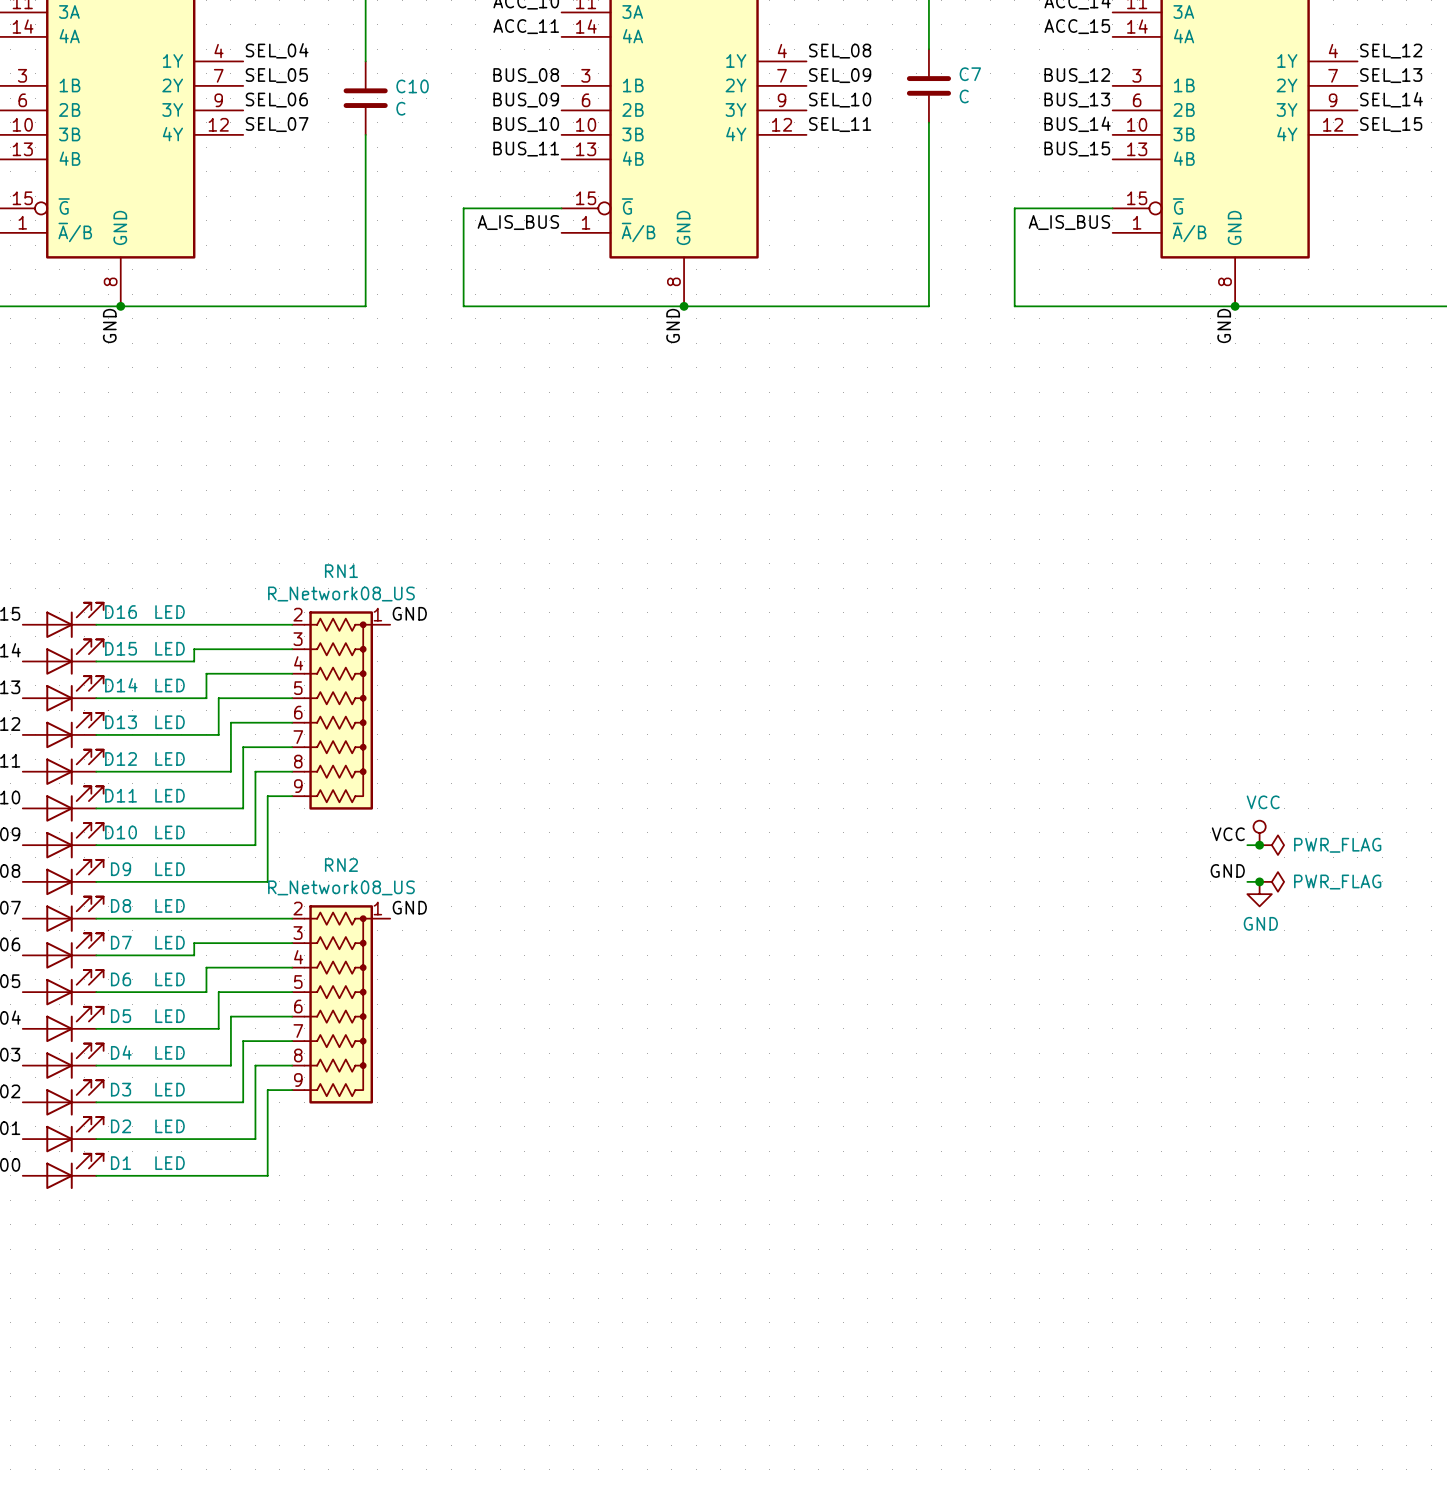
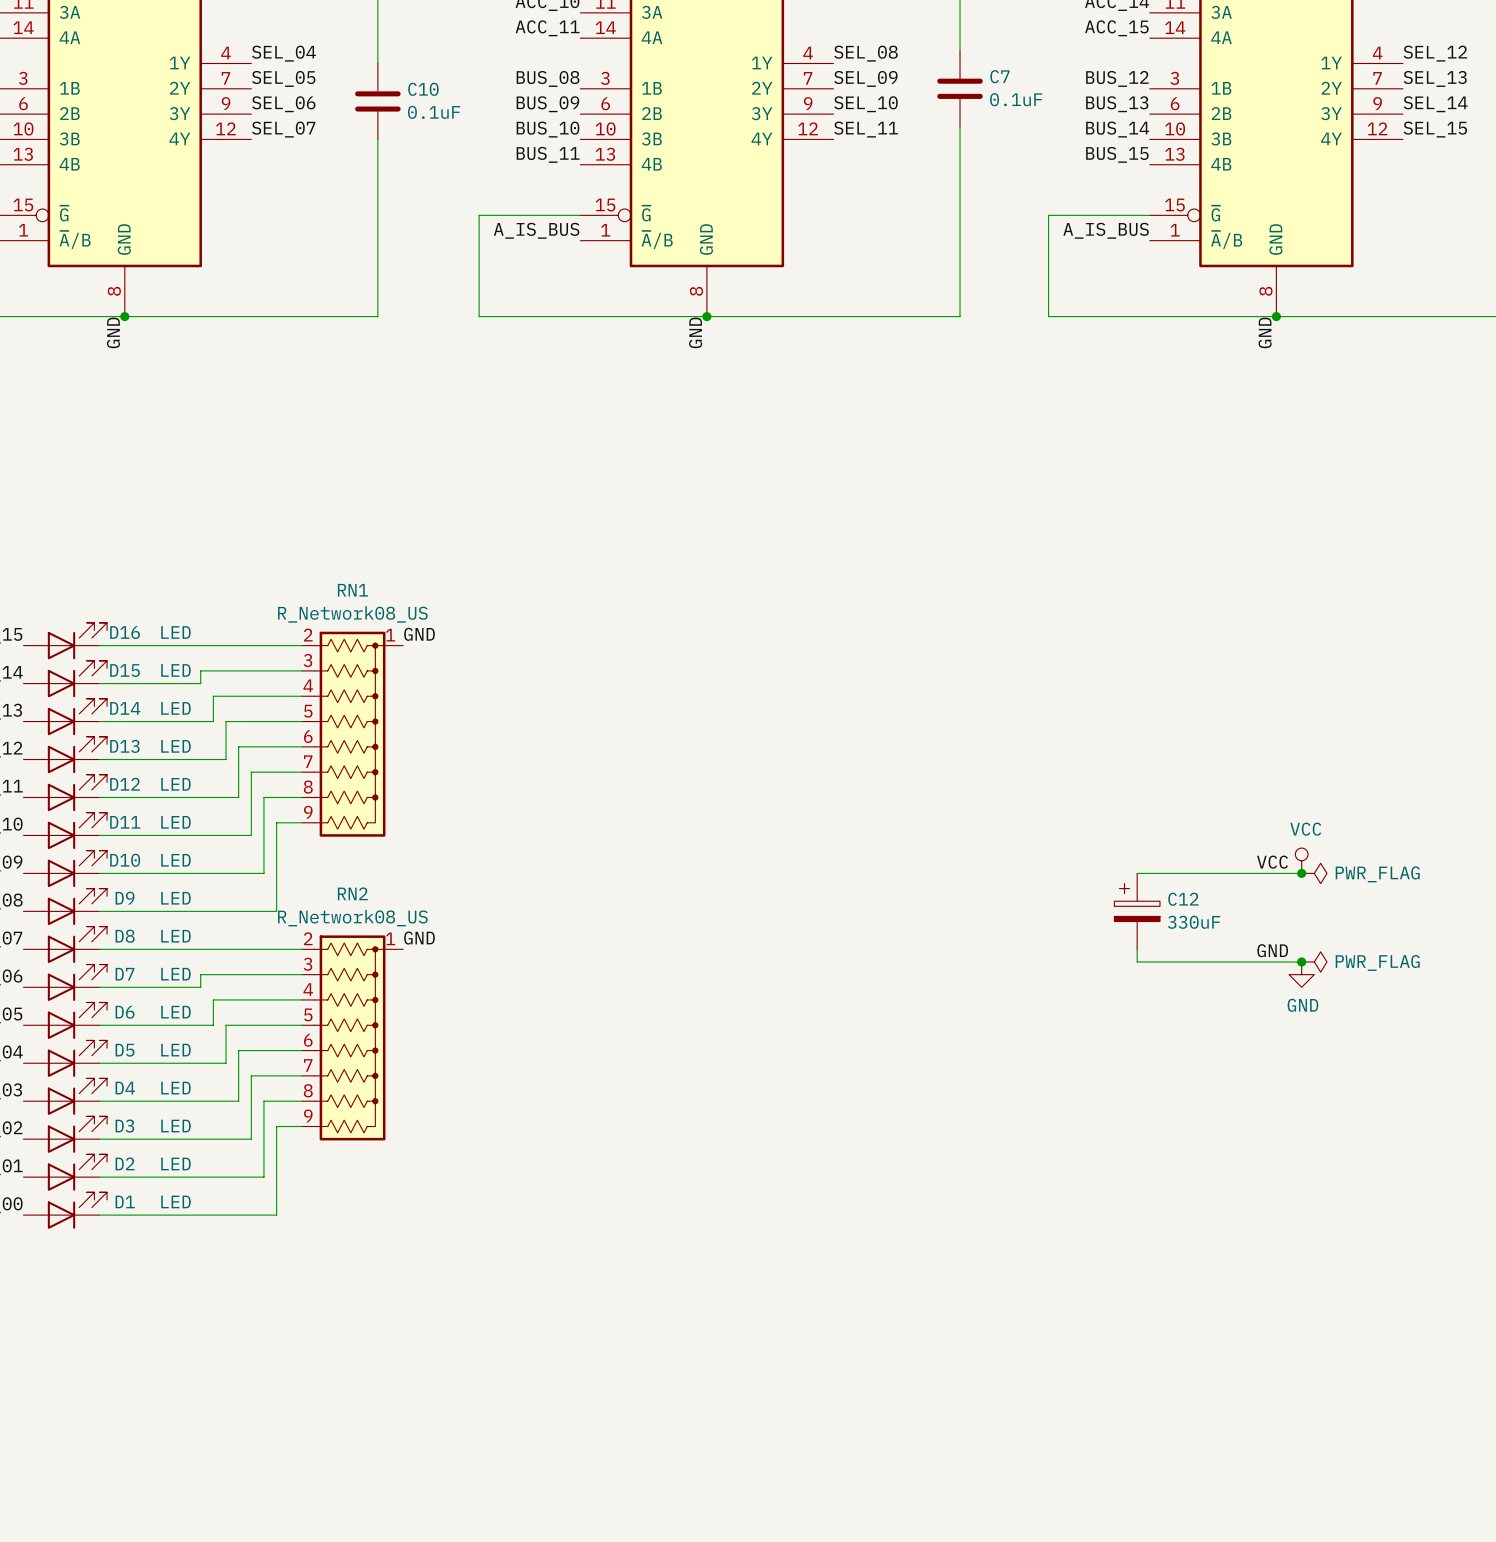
C7 value: C (964, 96) -> 0.1uF (1016, 99)
C10 value: C (400, 108) -> 0.1uF (434, 112)
wire: none -> (1137, 873) (1289, 873)
label position: GND (1227, 870) -> GND (1272, 950)
C12: none -> 330uF (1137, 911)
wire: (1247, 881) (1259, 881) -> none
junction position: (1259, 881) -> (1301, 961)
power symbol position: PWR_FLAG (1271, 881) -> PWR_FLAG (1314, 961)
power symbol position: GND (1259, 894) -> GND (1301, 974)
wire: none -> (1137, 949) (1137, 961) (1301, 961)

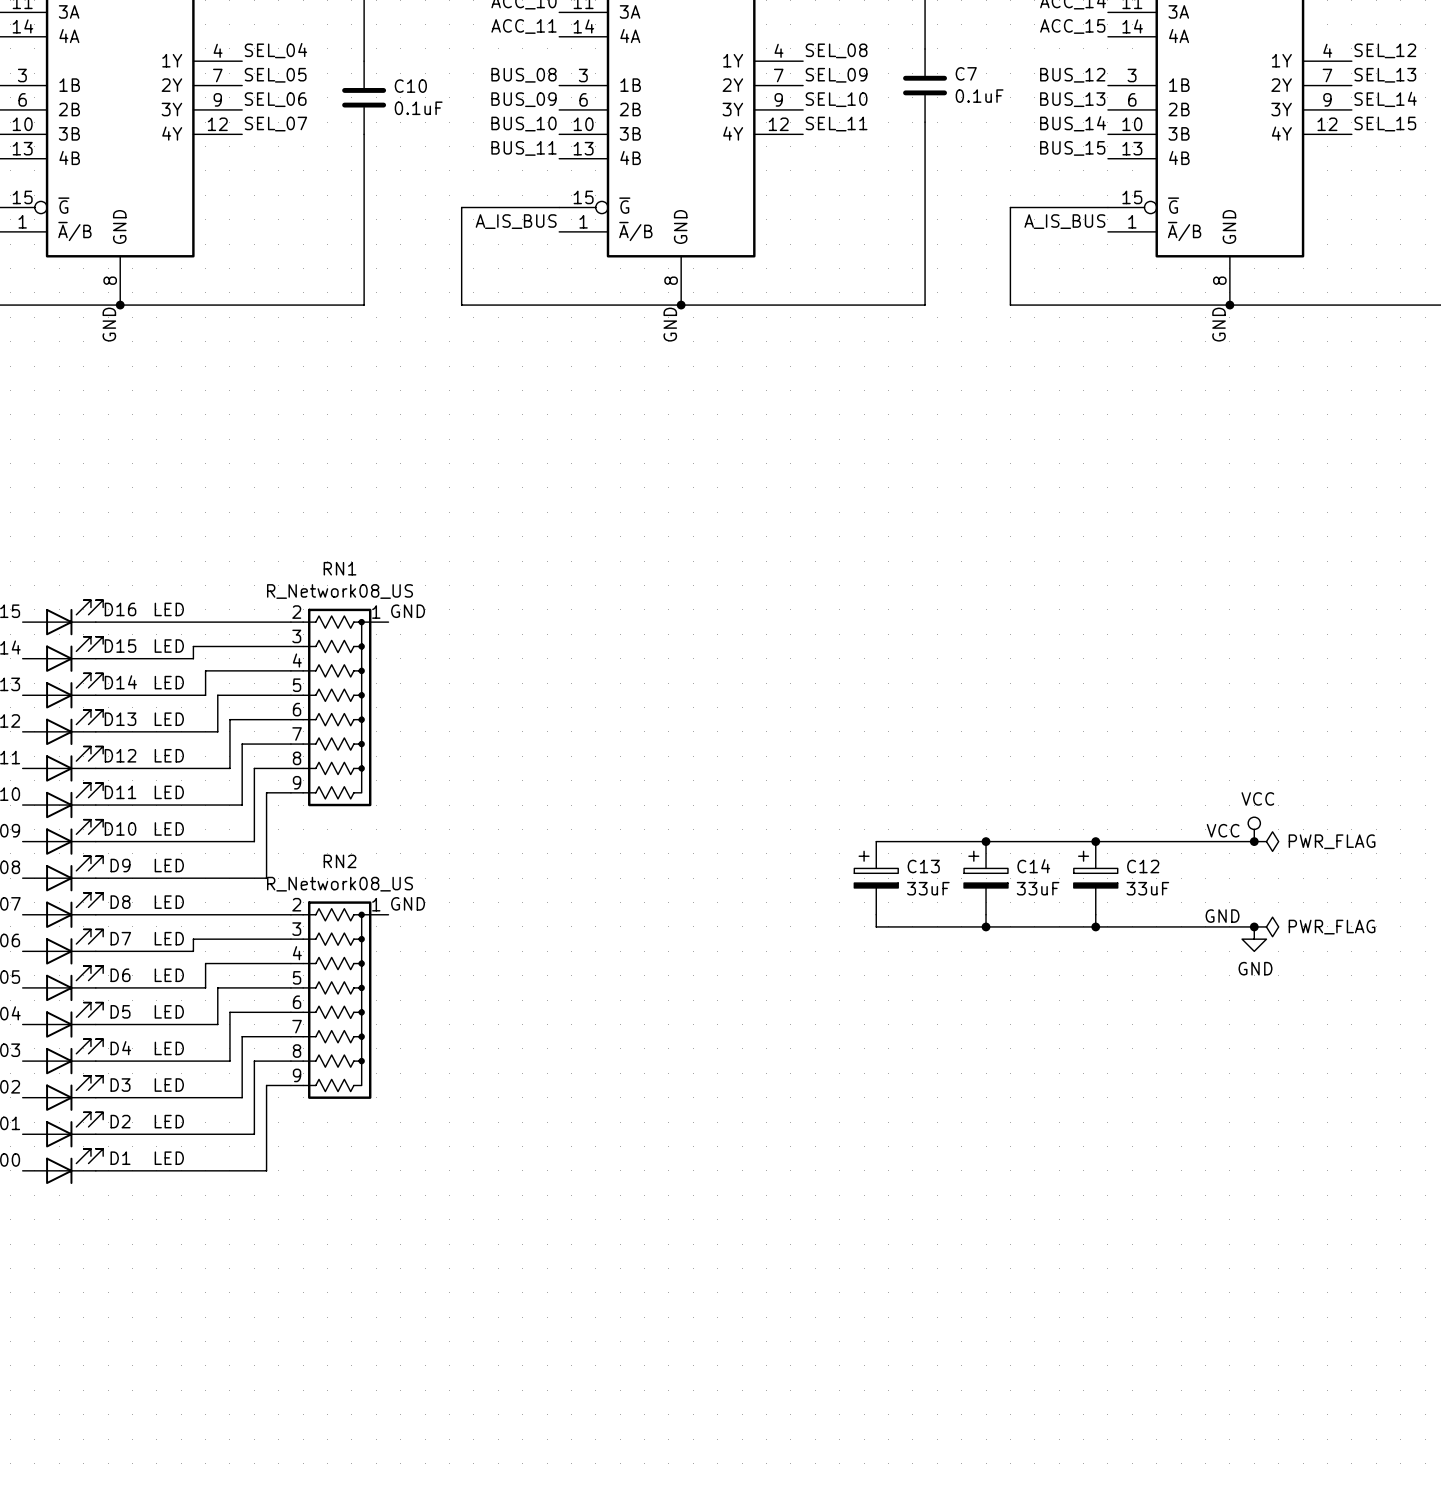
wire: none -> (876, 841) (1095, 841)
junction: none -> (986, 841)
junction: none -> (1095, 841)
C13: none -> 33uF (876, 878)
C14: none -> 33uF (986, 878)
C12 value: 330uF (1194, 922) -> 33uF (1147, 888)
wire: none -> (876, 914) (876, 926) (1095, 926)
wire: none -> (986, 914) (986, 926)
junction: none -> (986, 926)
junction: none -> (1095, 926)

